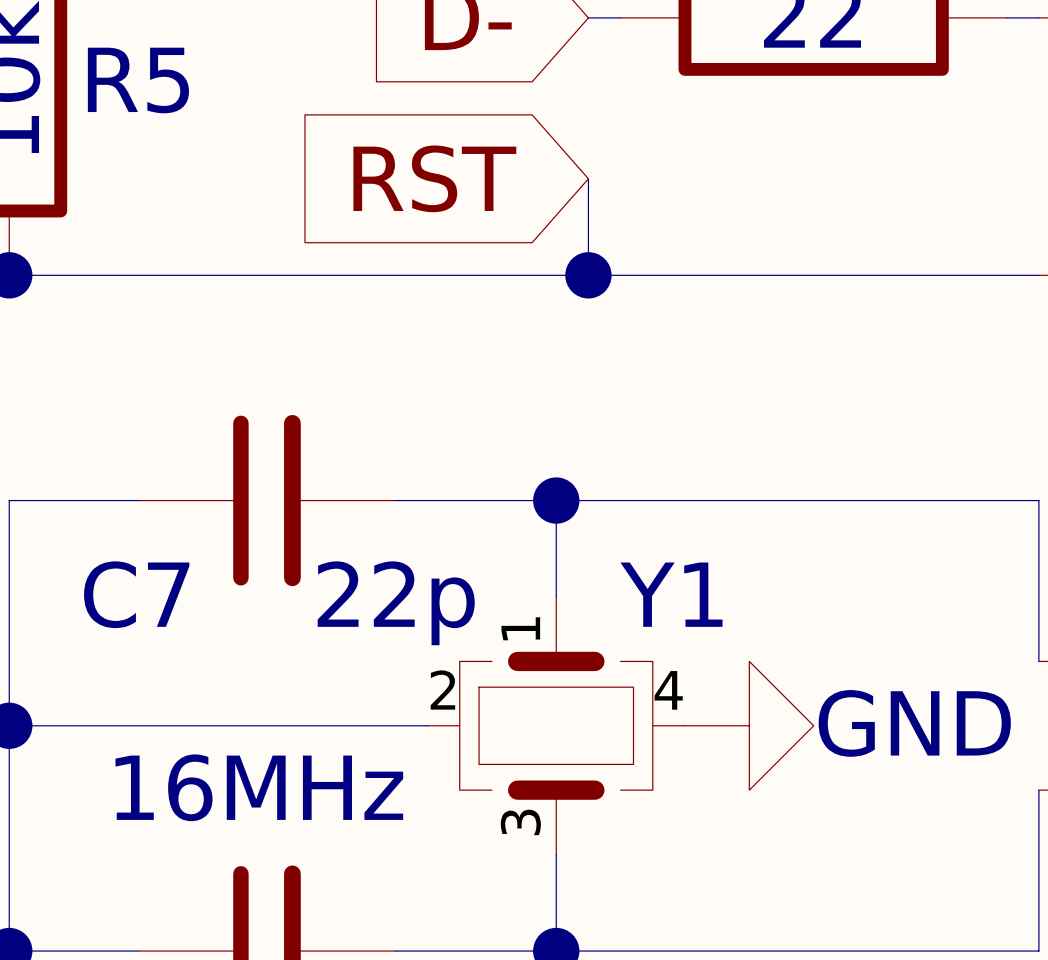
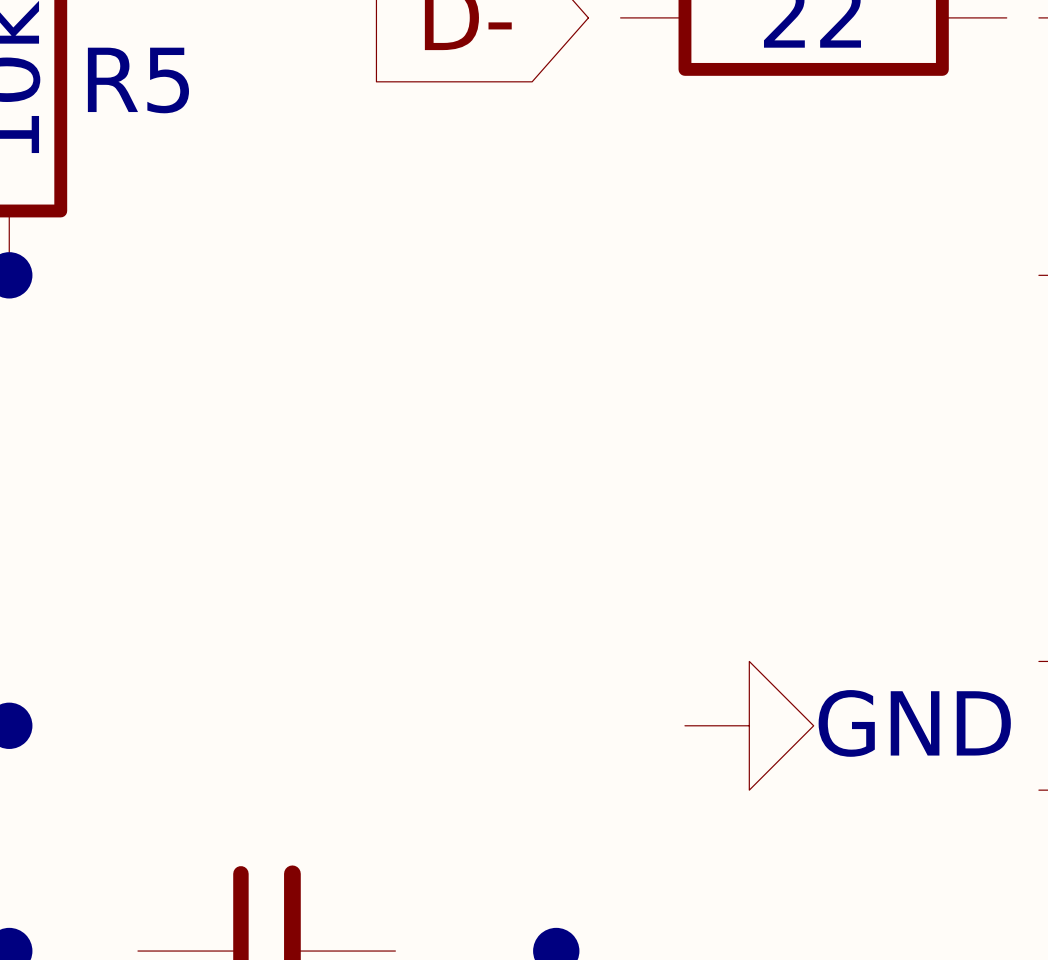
wire: (588, 17) (620, 17) -> none
wire: (1006, 17) (1038, 17) -> none
global label: RST (434, 178) -> none
wire: (588, 178) (588, 275) -> none
wire: (9, 275) (1038, 275) -> none
junction: (588, 275) -> none
wire: (137, 500) (9, 500) (9, 951) (137, 951) -> none
C7: 22p (266, 500) -> none
wire: (395, 500) (1038, 500) (1038, 661) -> none
wire: (556, 500) (556, 597) -> none
junction: (556, 500) -> none
wire: (9, 725) (427, 725) -> none
Y1: 16MHz (556, 725) -> none
wire: (1038, 790) (1038, 951) (395, 951) -> none
wire: (556, 854) (556, 951) -> none

